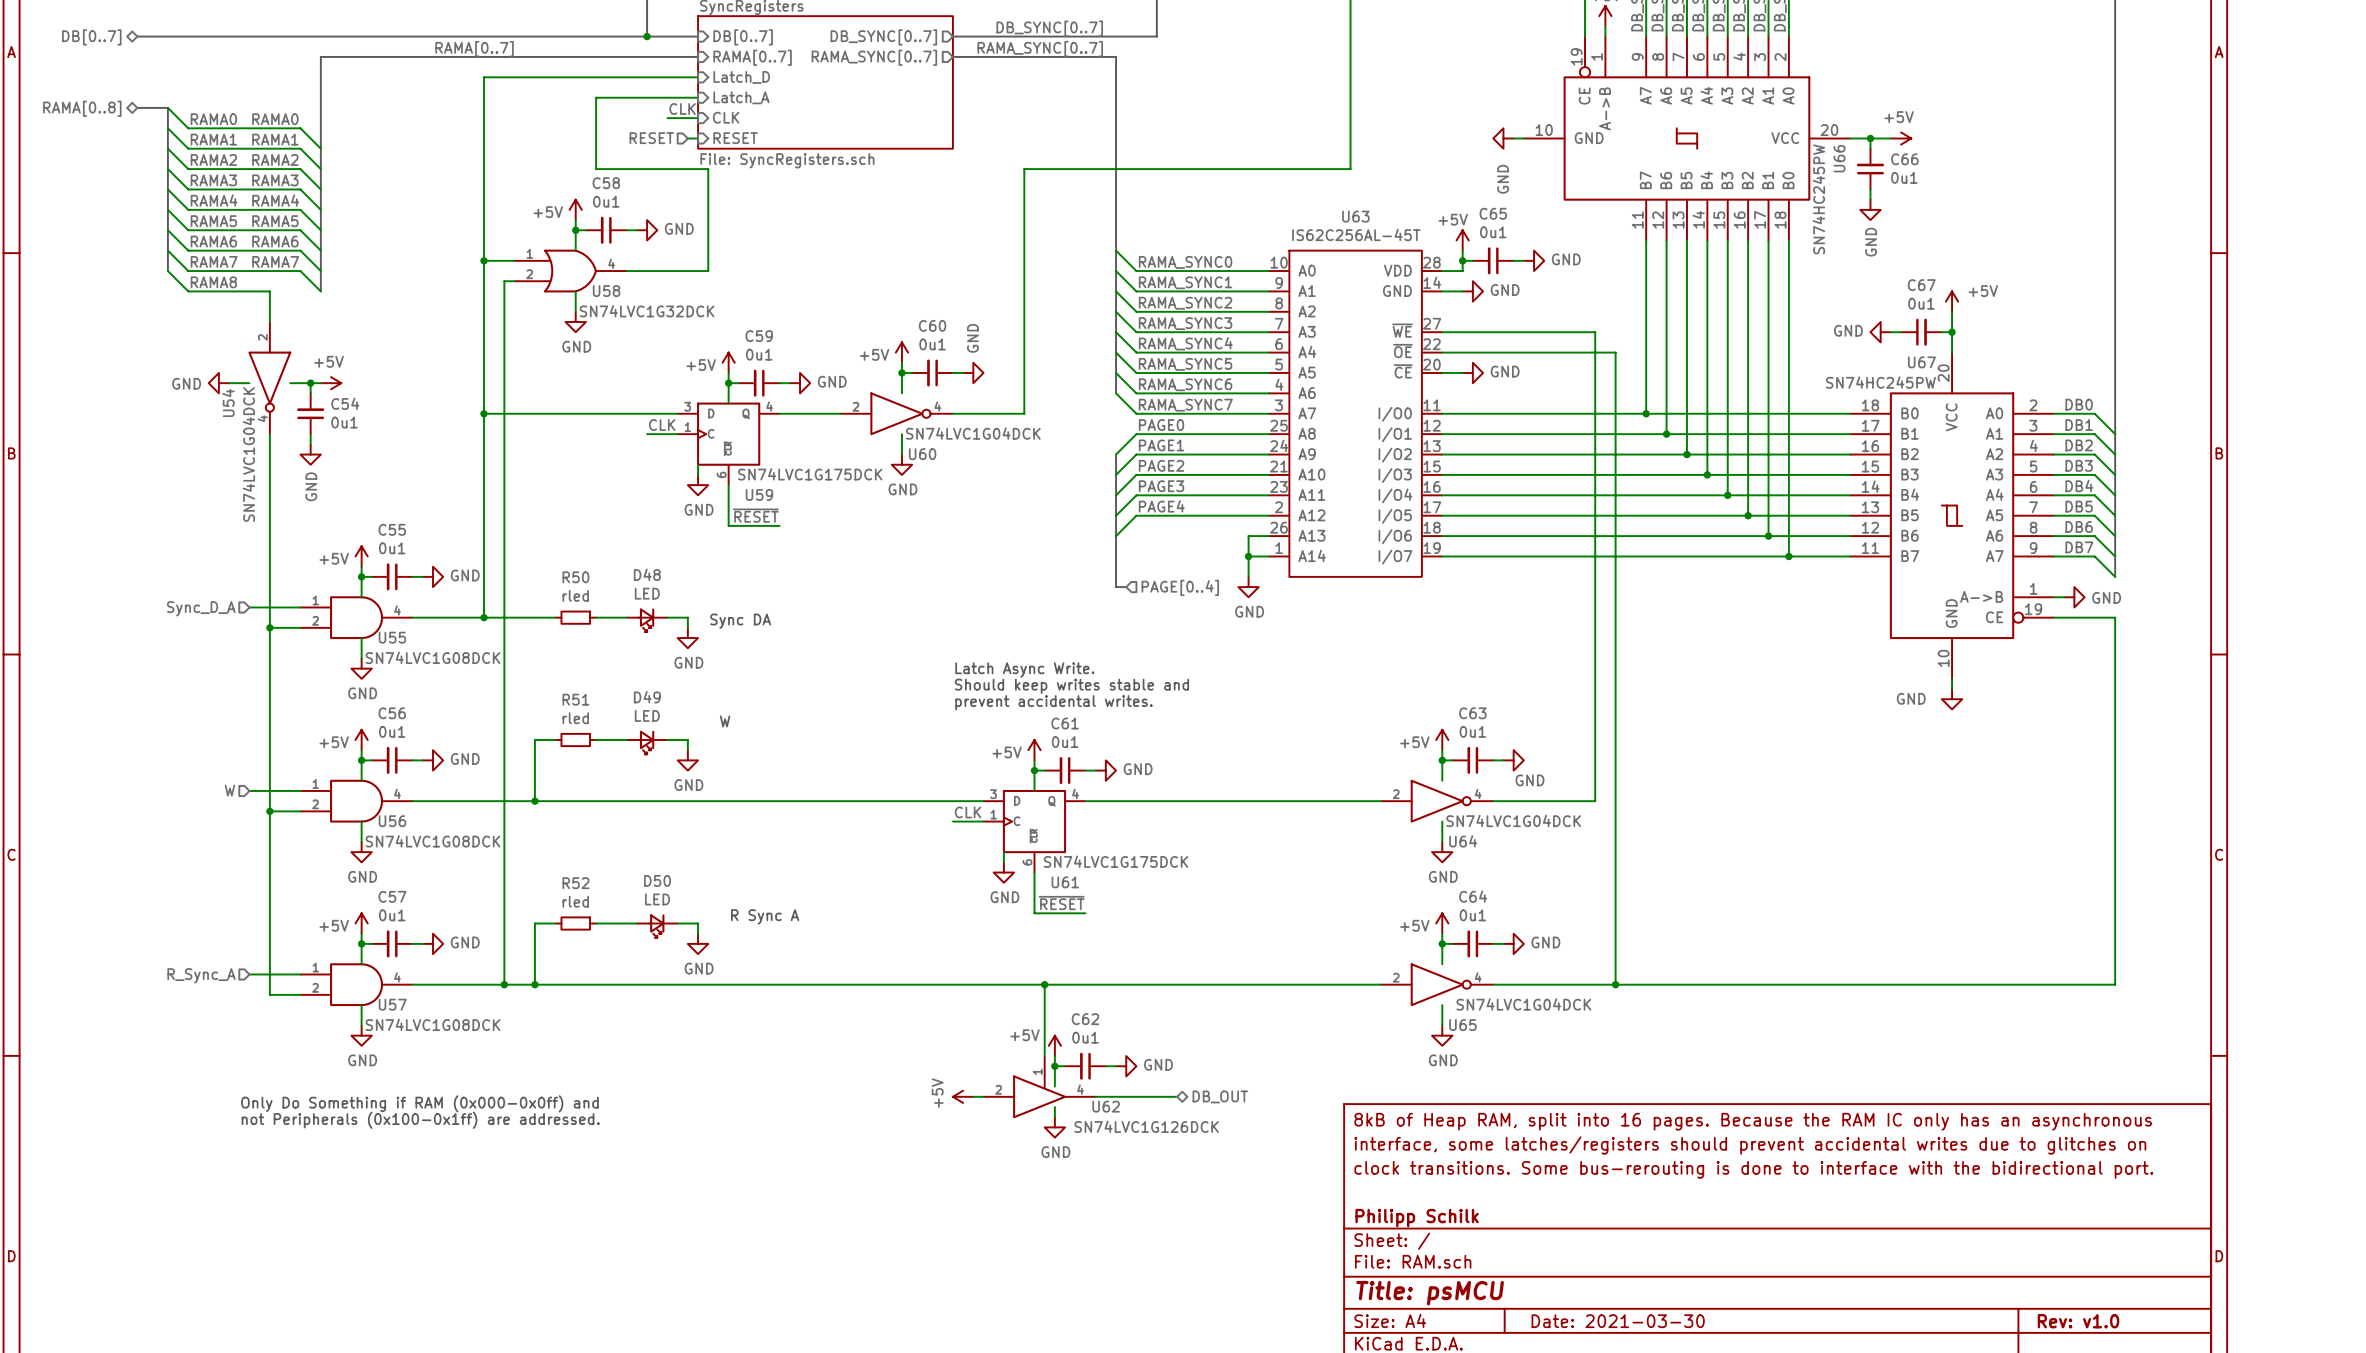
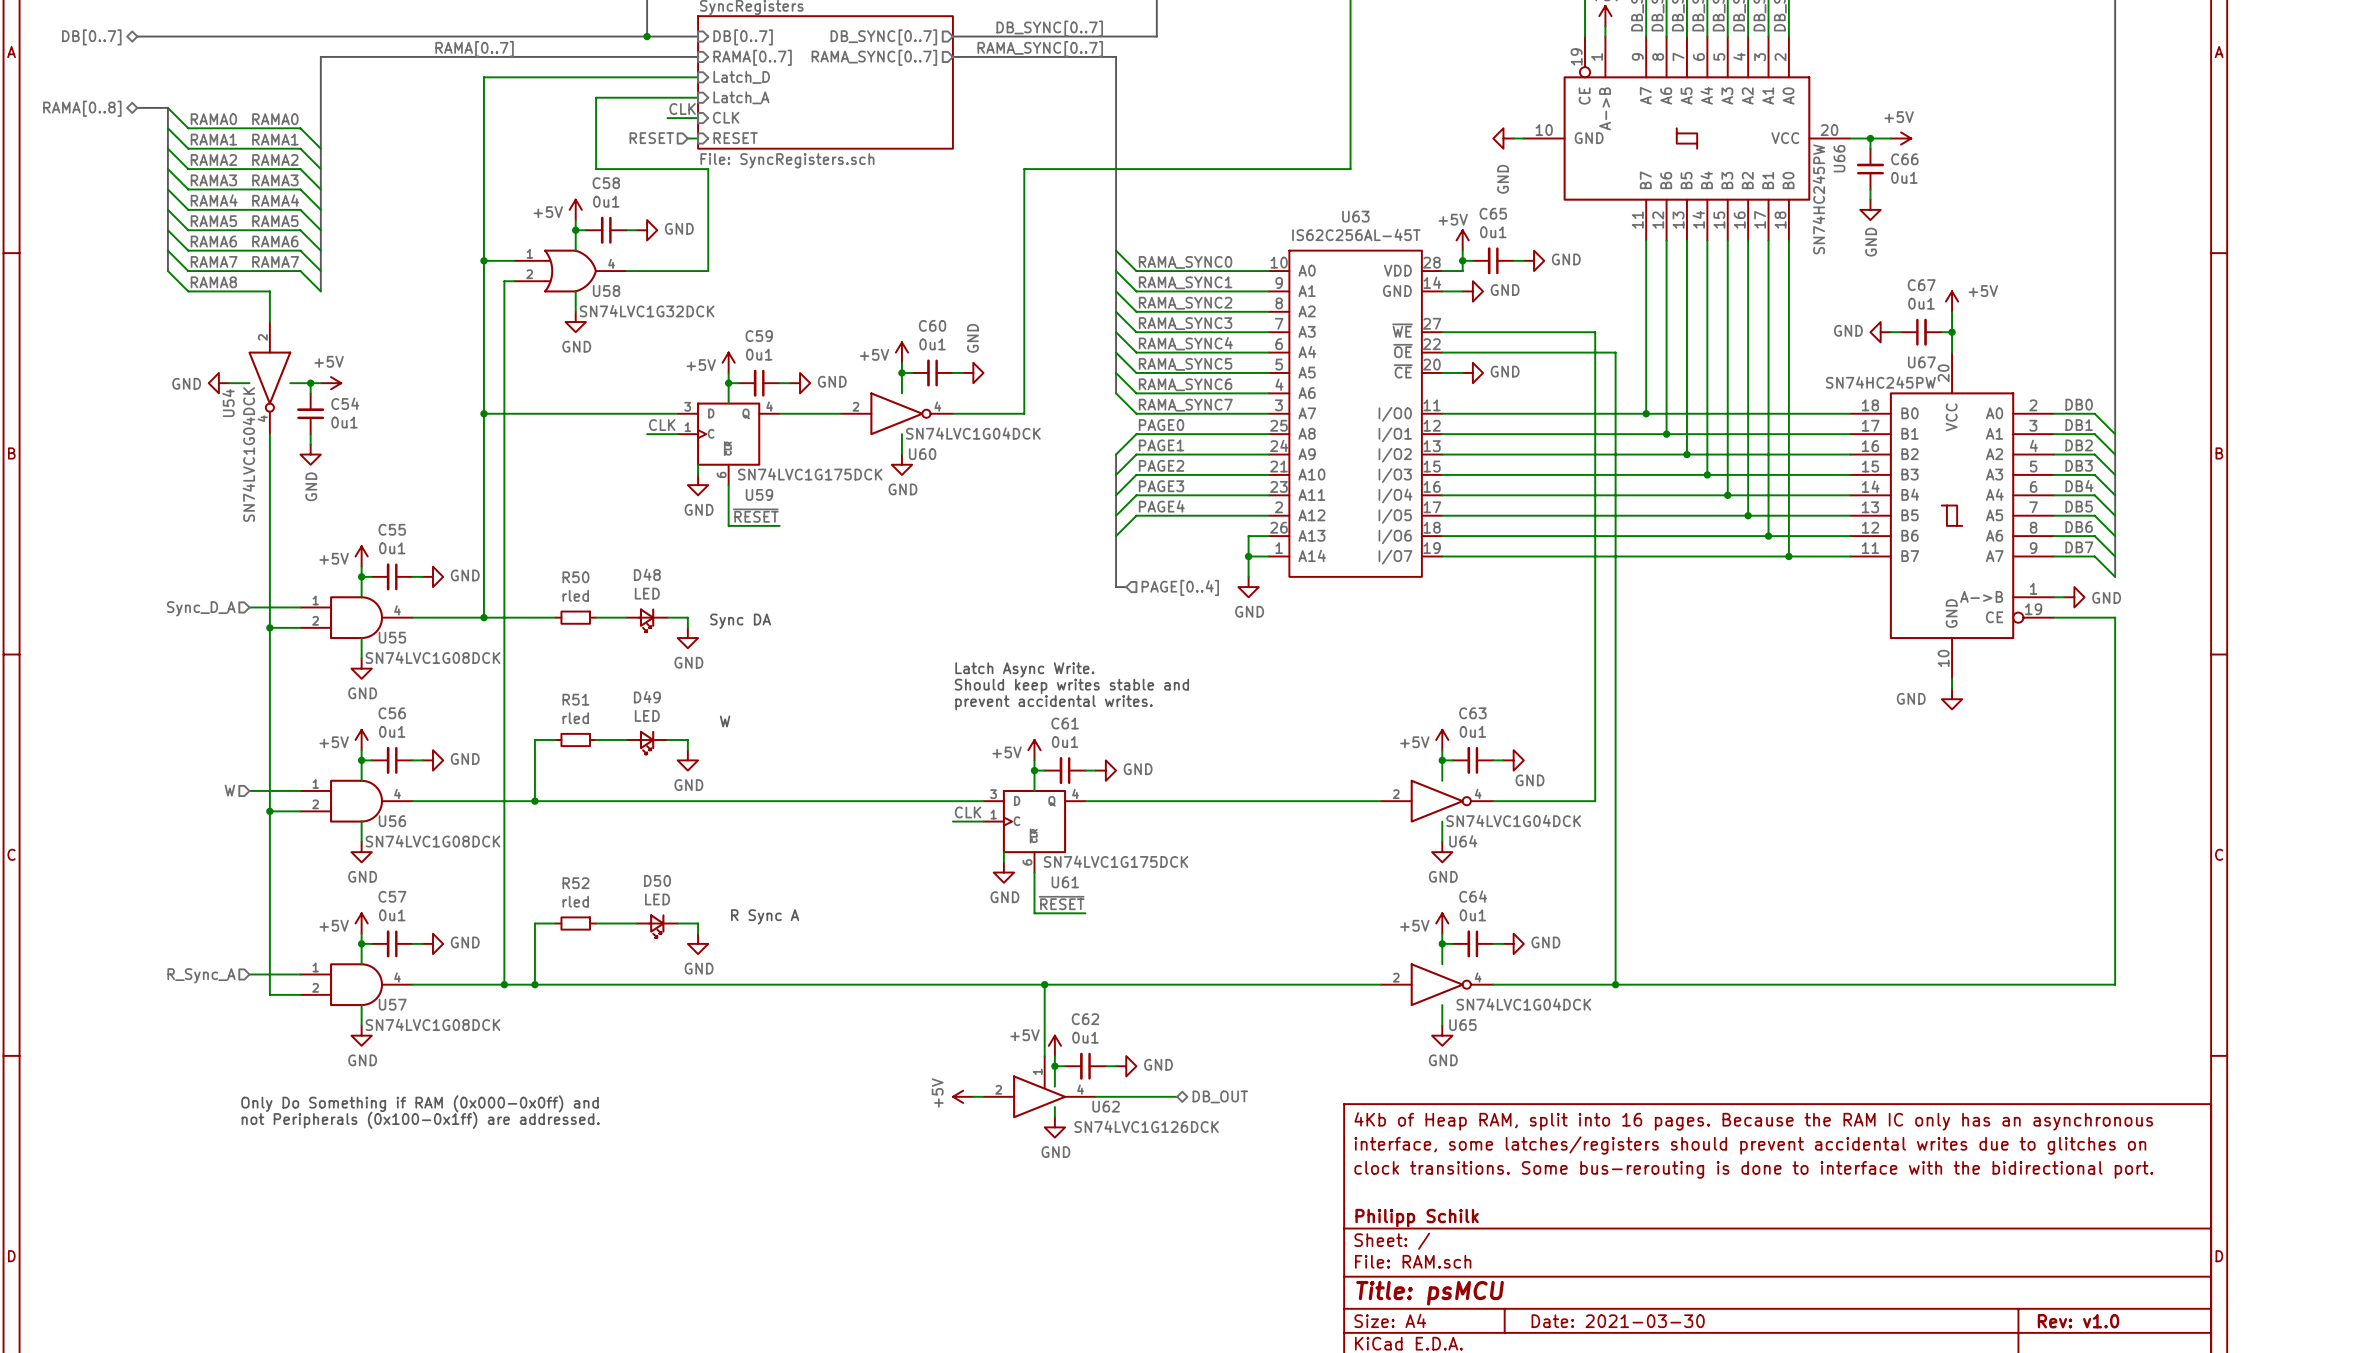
title block: 8kB of Heap RAM, split into 16 pages. Because the RAM IC only has an asynchronous (1753, 1121) -> 4Kb of Heap RAM, split into 16 pages. Because the RAM IC only has an asynchronous (1753, 1121)

